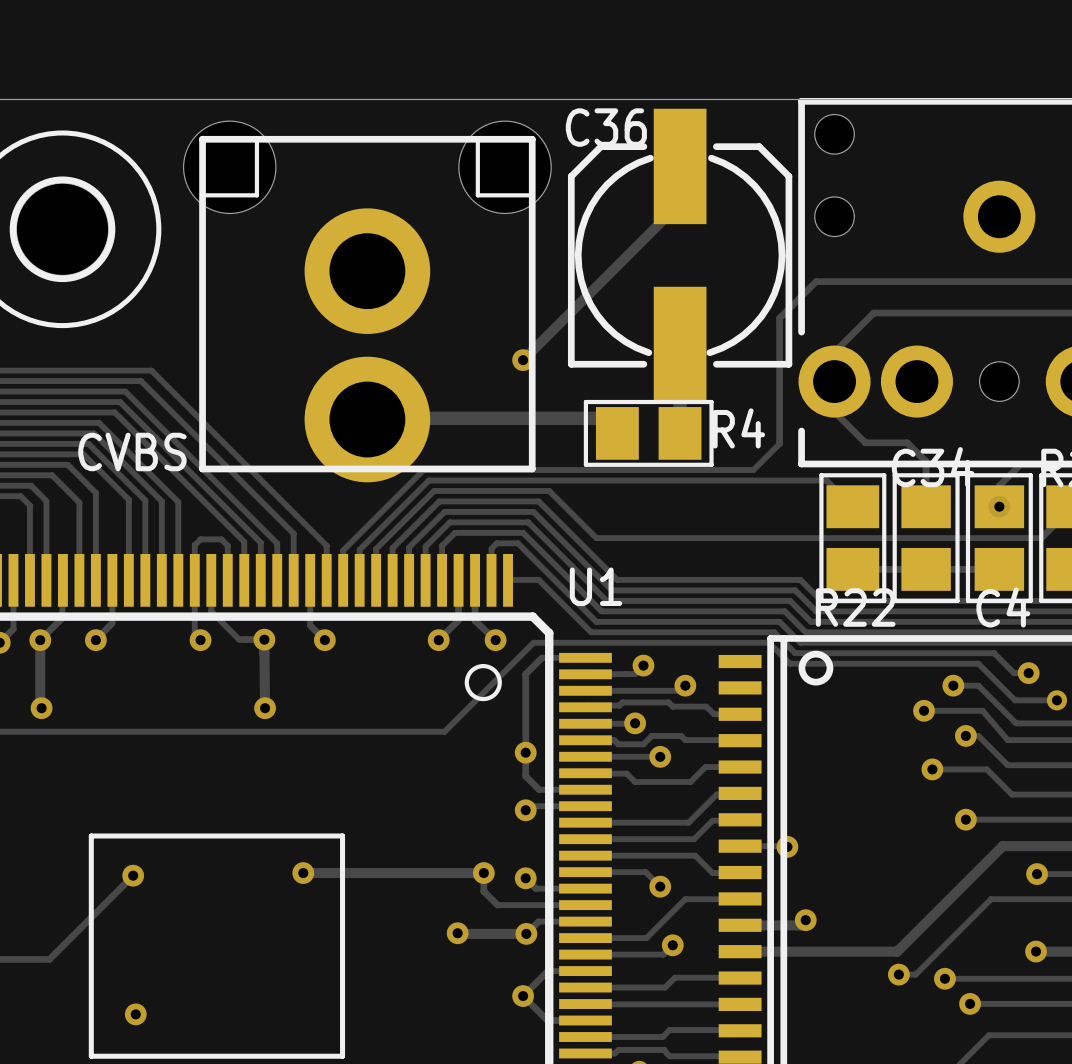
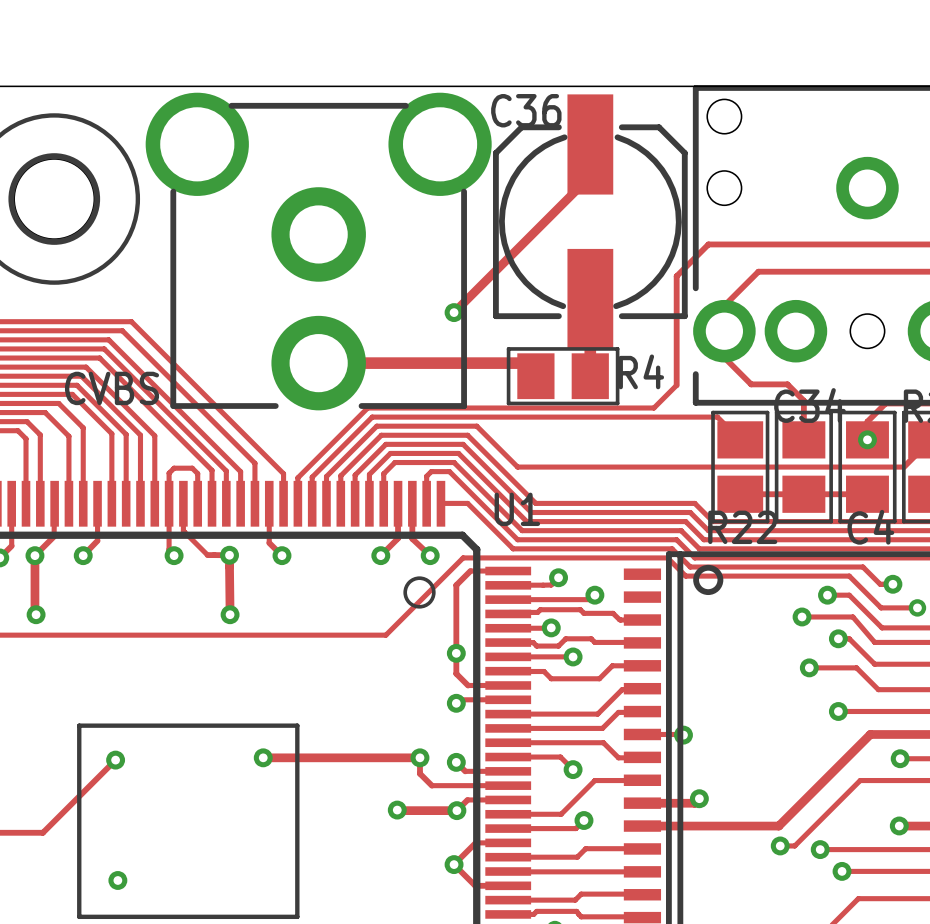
CVBS footprint: [183, 121, 552, 483] -> [145, 92, 492, 411]

